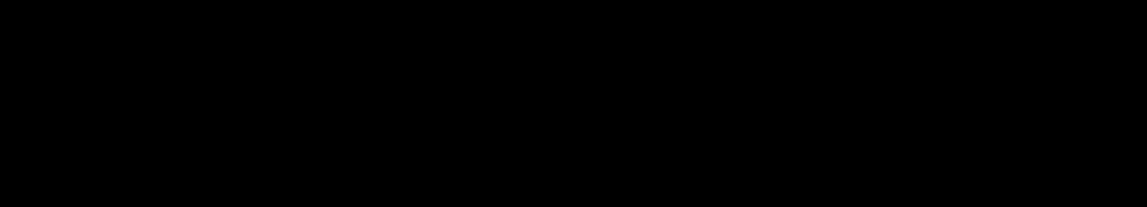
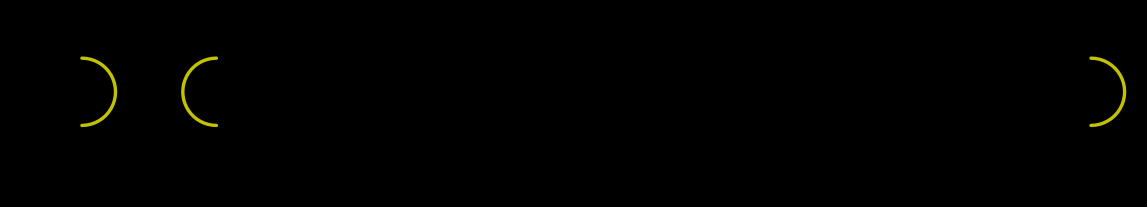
board edge: none -> (81, 58) (94, 60) (105, 68) (112, 78) (115, 91) (112, 104) (105, 115) (94, 122) (81, 125)
board edge: none -> (216, 58) (204, 60) (194, 66) (186, 76) (182, 91) (186, 107) (194, 116) (204, 123) (216, 125)
board edge: none -> (1090, 58) (1103, 60) (1114, 68) (1122, 78) (1124, 91) (1122, 104) (1114, 115) (1103, 122) (1090, 125)

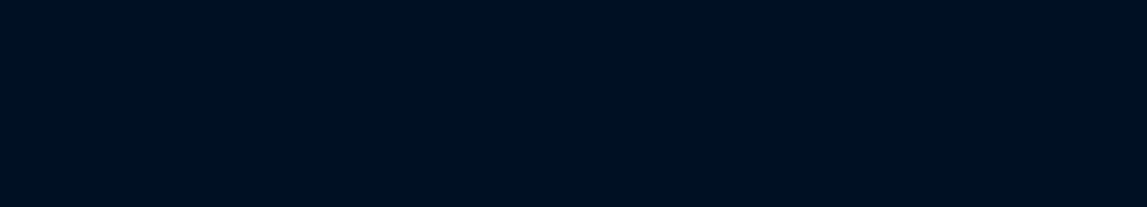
board edge: (81, 58) (94, 60) (105, 68) (112, 78) (115, 91) (112, 104) (105, 115) (94, 122) (81, 125) -> none
board edge: (216, 58) (204, 60) (194, 66) (186, 76) (182, 91) (186, 107) (194, 116) (204, 123) (216, 125) -> none
board edge: (1090, 58) (1103, 60) (1114, 68) (1122, 78) (1124, 91) (1122, 104) (1114, 115) (1103, 122) (1090, 125) -> none

